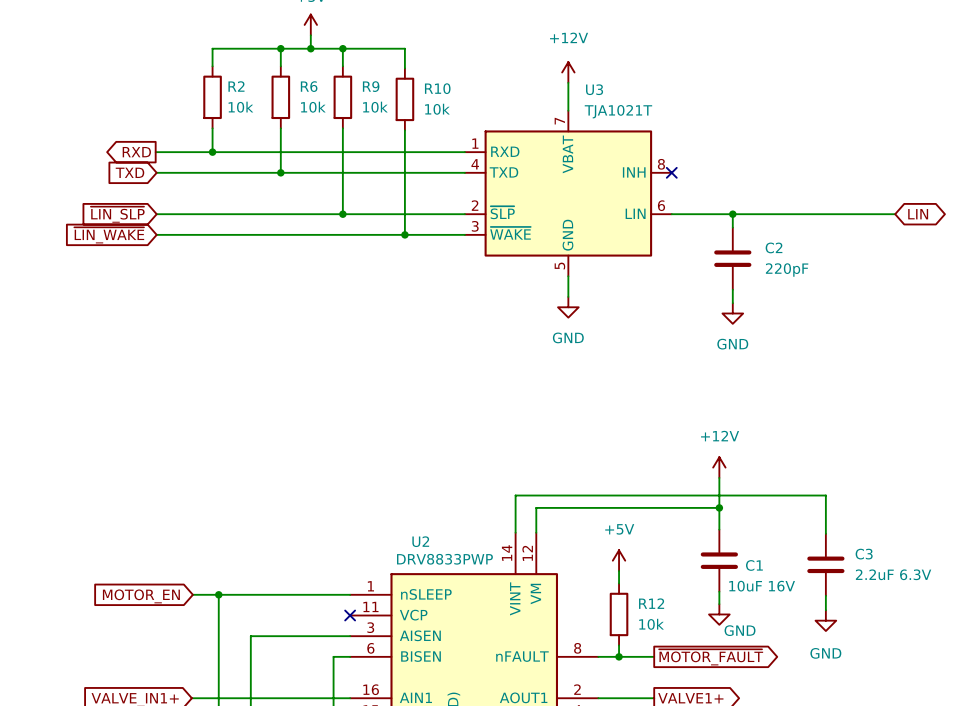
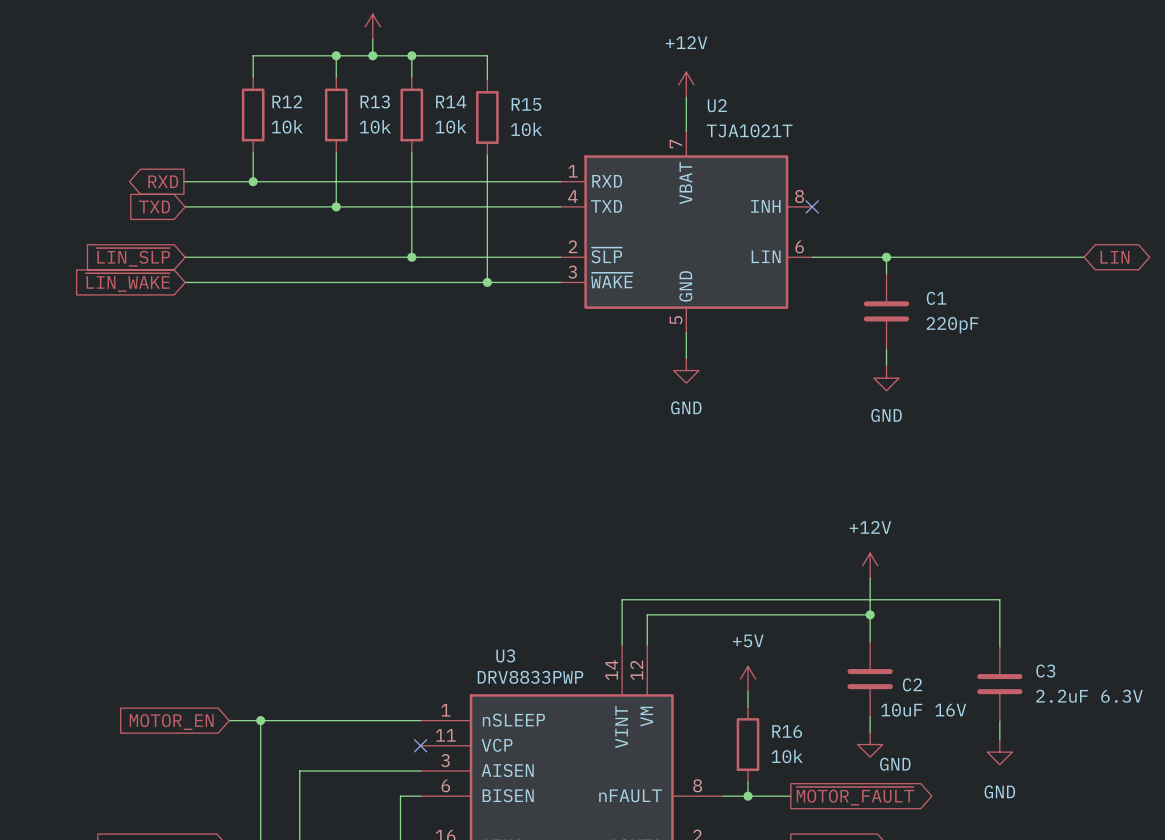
R2 name: R2 (236, 86) -> R12 (287, 101)
R6 name: R6 (309, 86) -> R13 (375, 101)
R9 name: R9 (371, 86) -> R14 (451, 101)
R10 name: R10 (437, 88) -> R15 (526, 104)
U3 name: U3 (594, 89) -> U2 (717, 105)
C2 name: C2 (774, 247) -> C1 (936, 298)
U2 name: U2 (420, 541) -> U3 (505, 655)
C1 name: C1 (754, 565) -> C2 (912, 684)
R12 name: R12 (651, 603) -> R16 (787, 731)

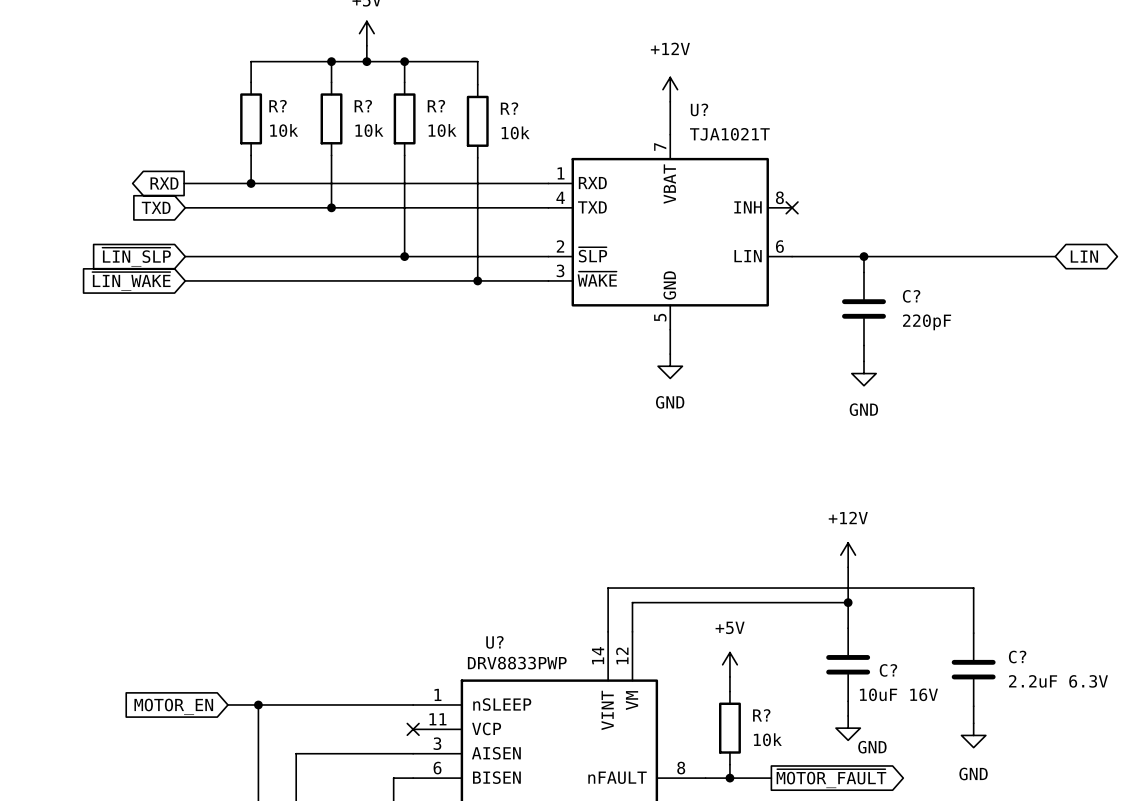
R12 name: R12 (287, 101) -> R? (278, 106)
R13 name: R13 (375, 101) -> R? (363, 106)
R14 name: R14 (451, 101) -> R? (436, 106)
R15 name: R15 (526, 104) -> R? (509, 108)
U2 name: U2 (717, 105) -> U? (699, 109)
C1 name: C1 (936, 298) -> C? (911, 296)
U3 name: U3 (505, 655) -> U? (494, 642)
C3 name: C3 (1045, 671) -> C? (1017, 657)
C2 name: C2 (912, 684) -> C? (888, 670)
R16 name: R16 (787, 731) -> R? (761, 715)

